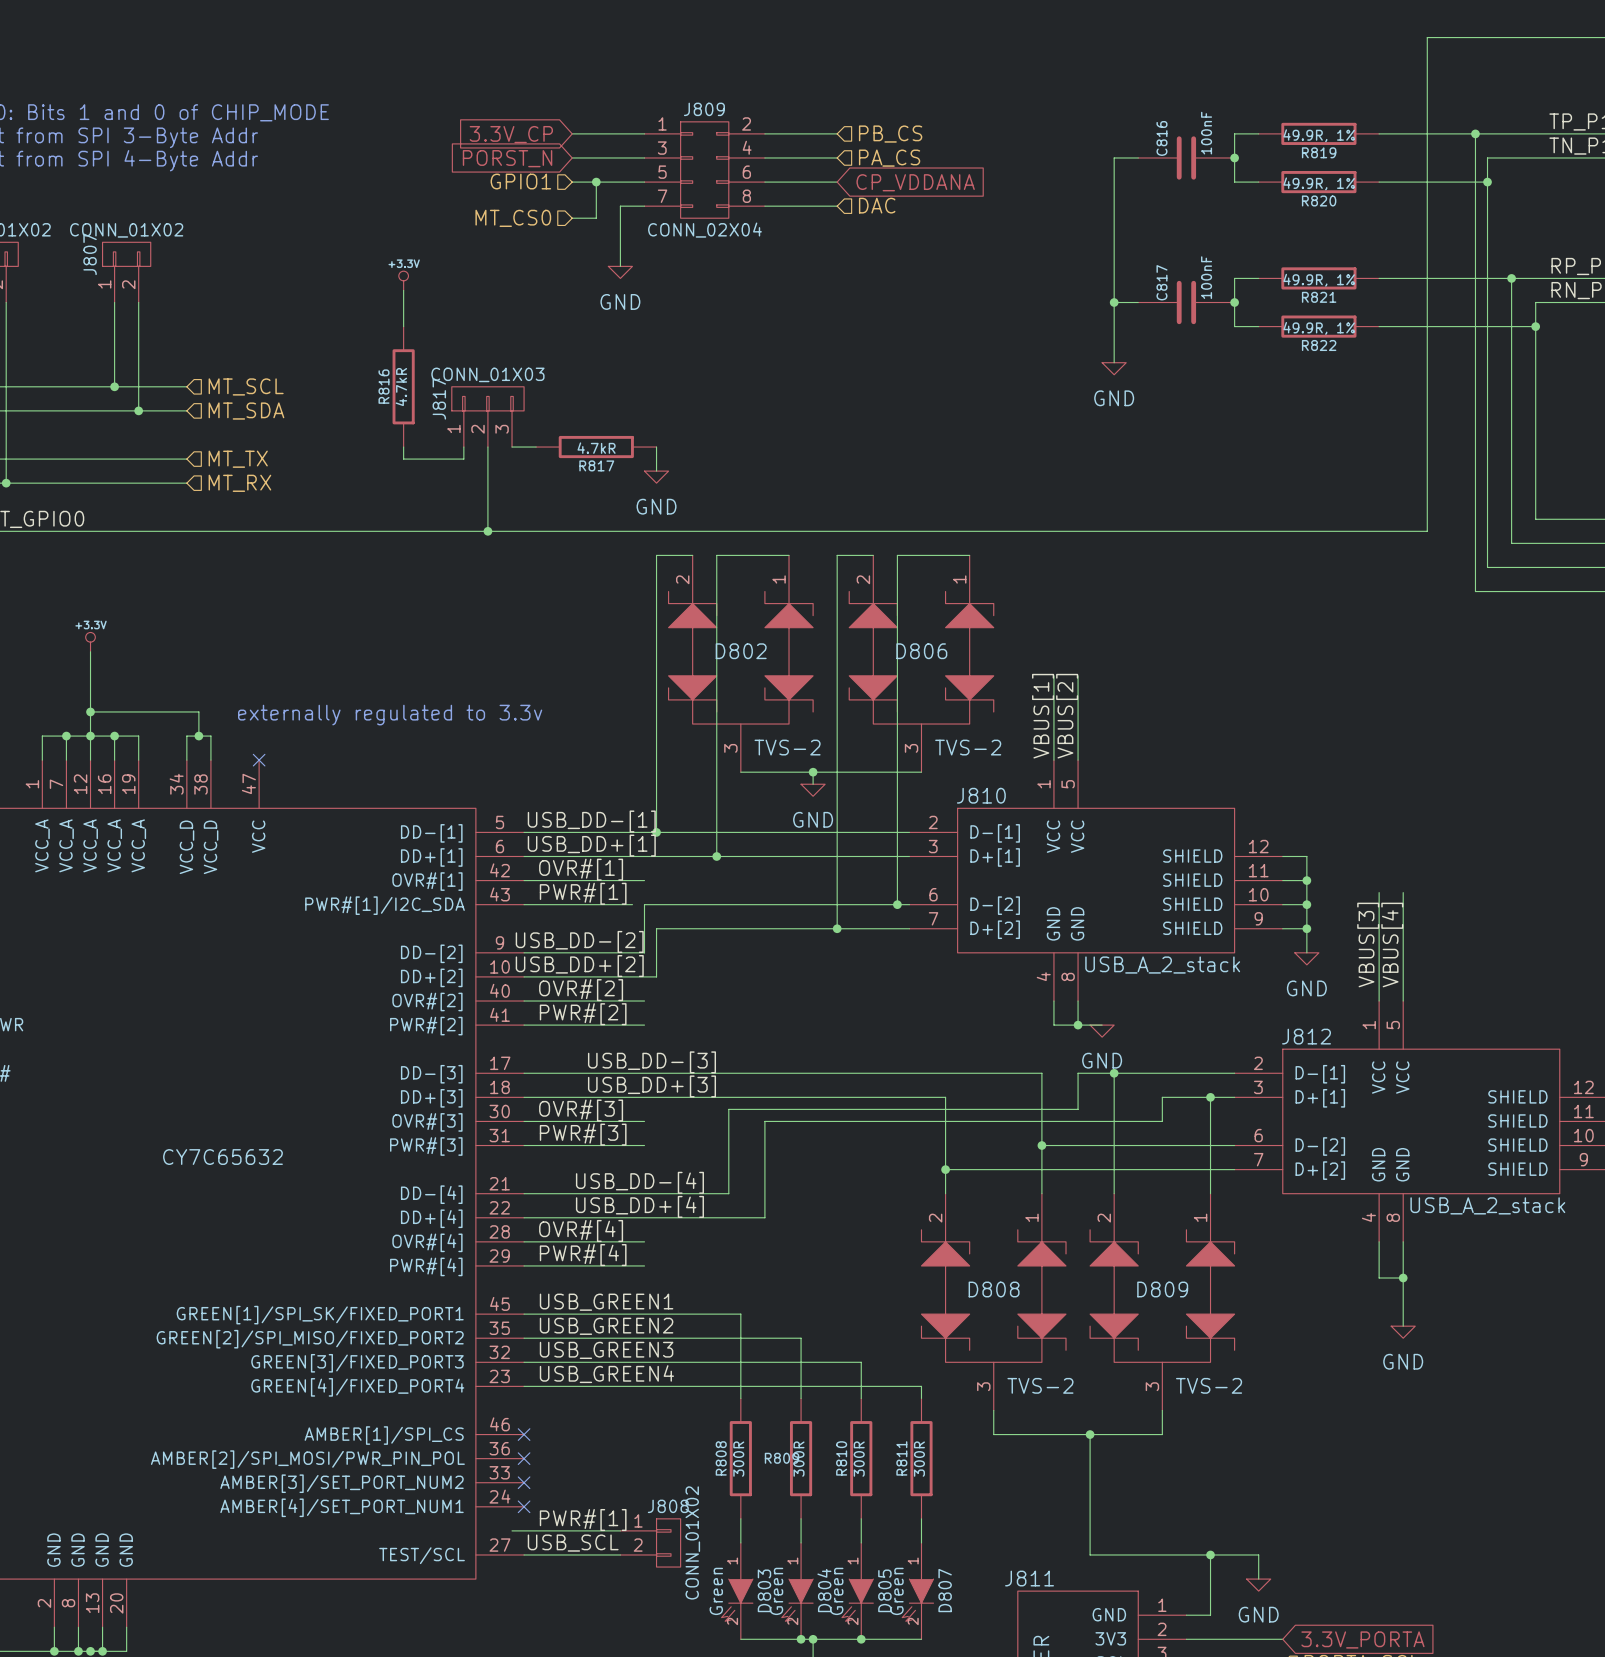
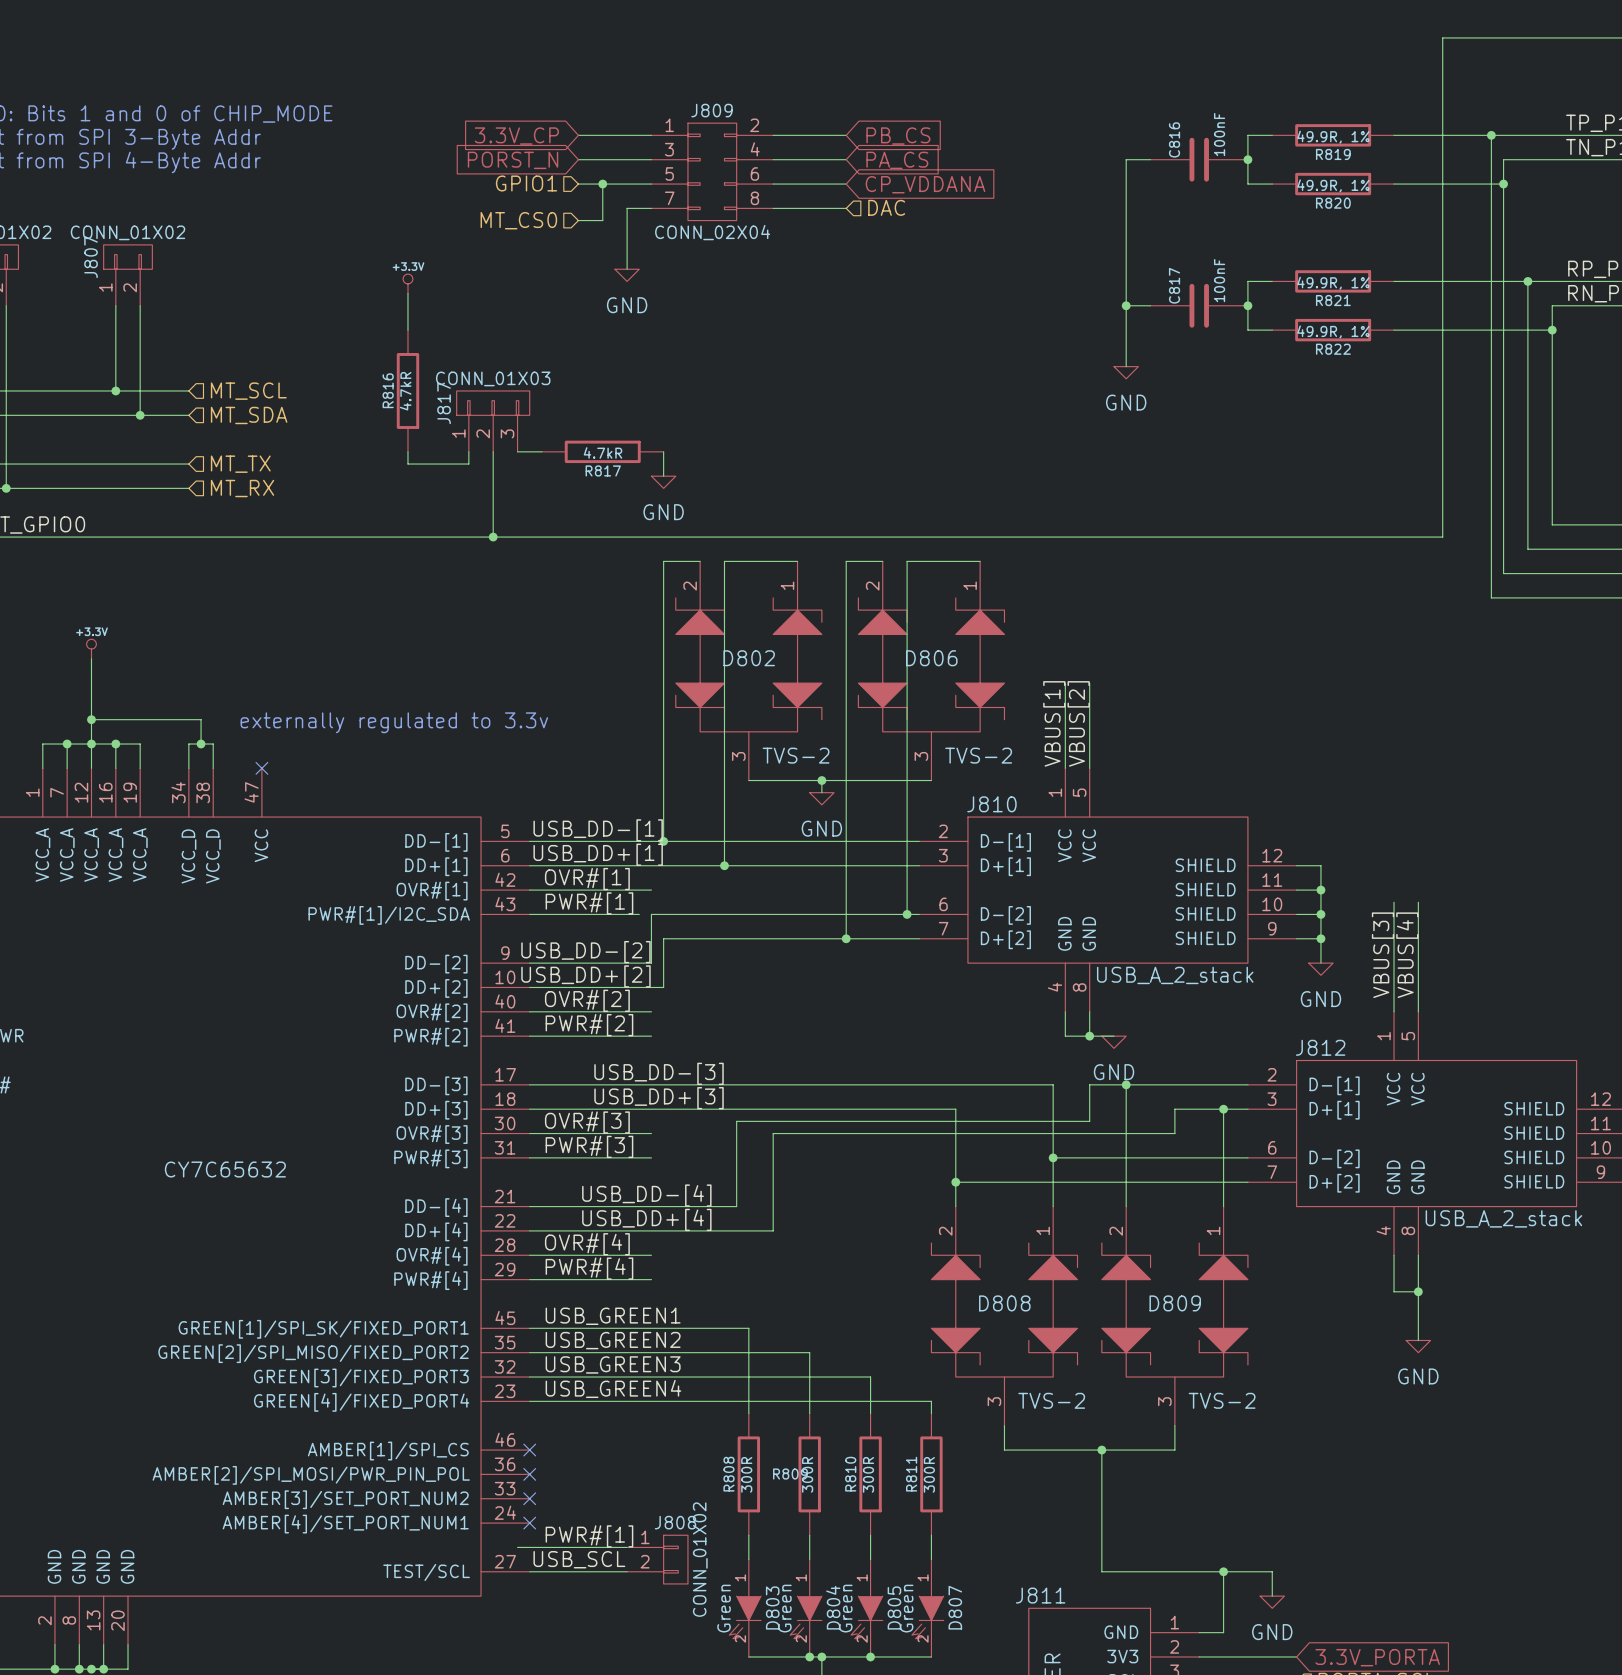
global label: none -> PB_CS (898, 136)
hierarchical label: PB_CS (890, 134) -> none
global label: none -> PA_CS (897, 160)
hierarchical label: PA_CS (889, 158) -> none

